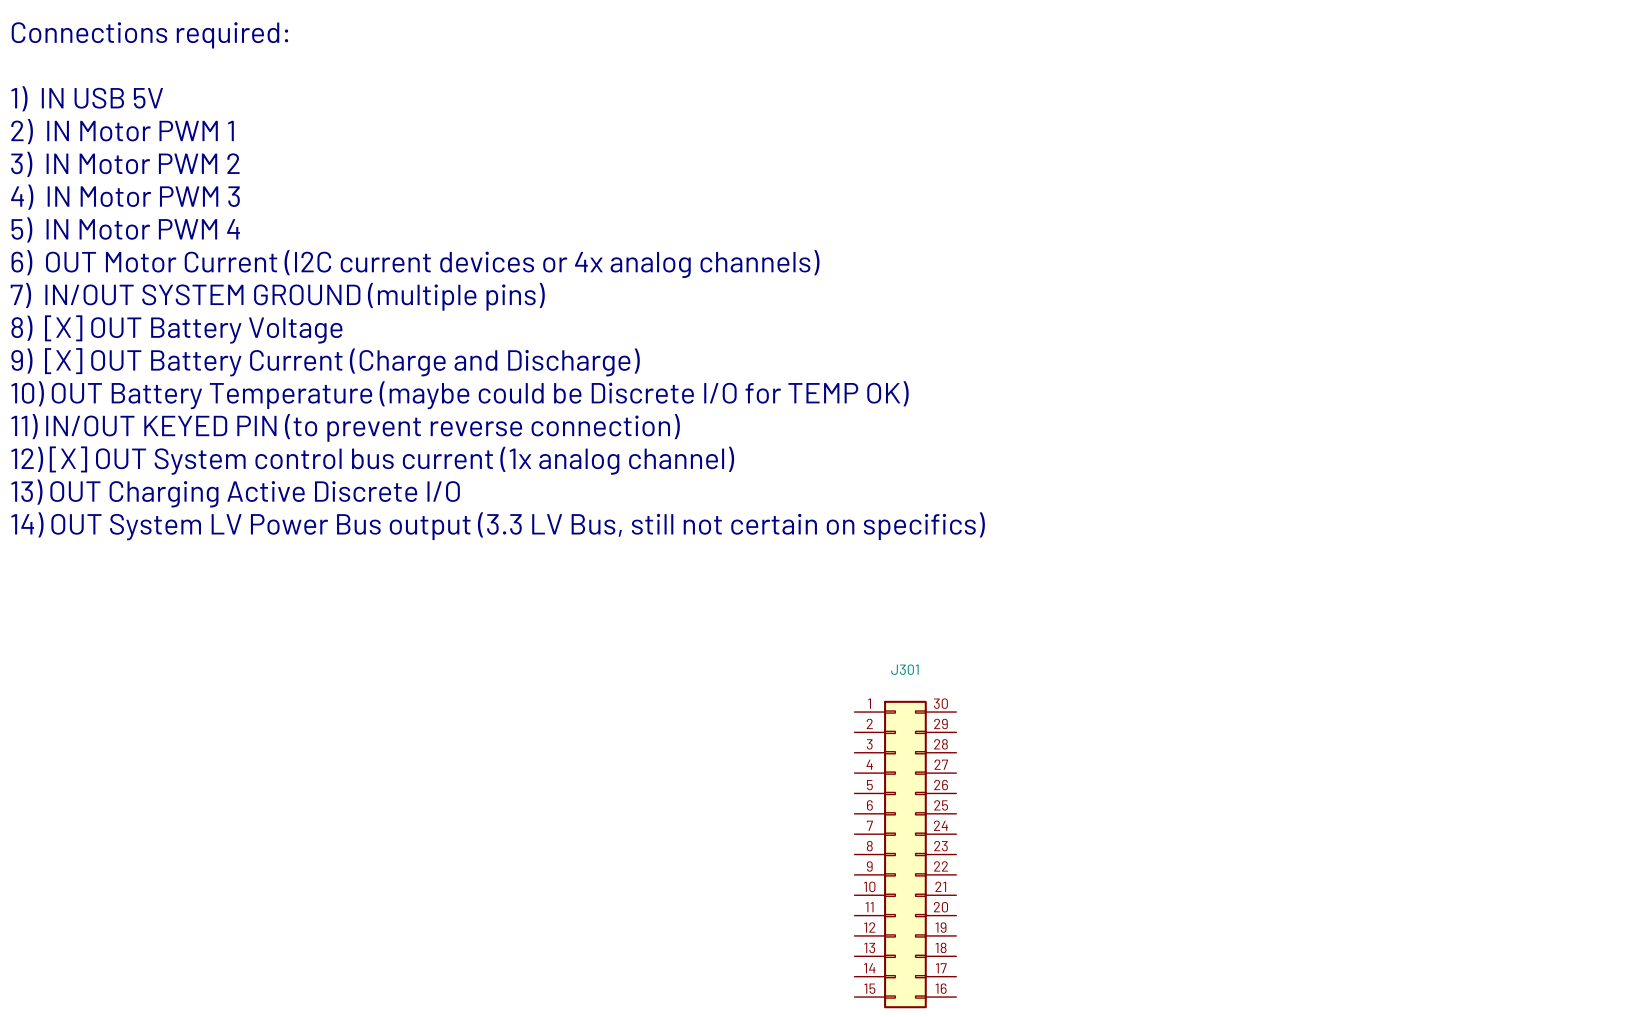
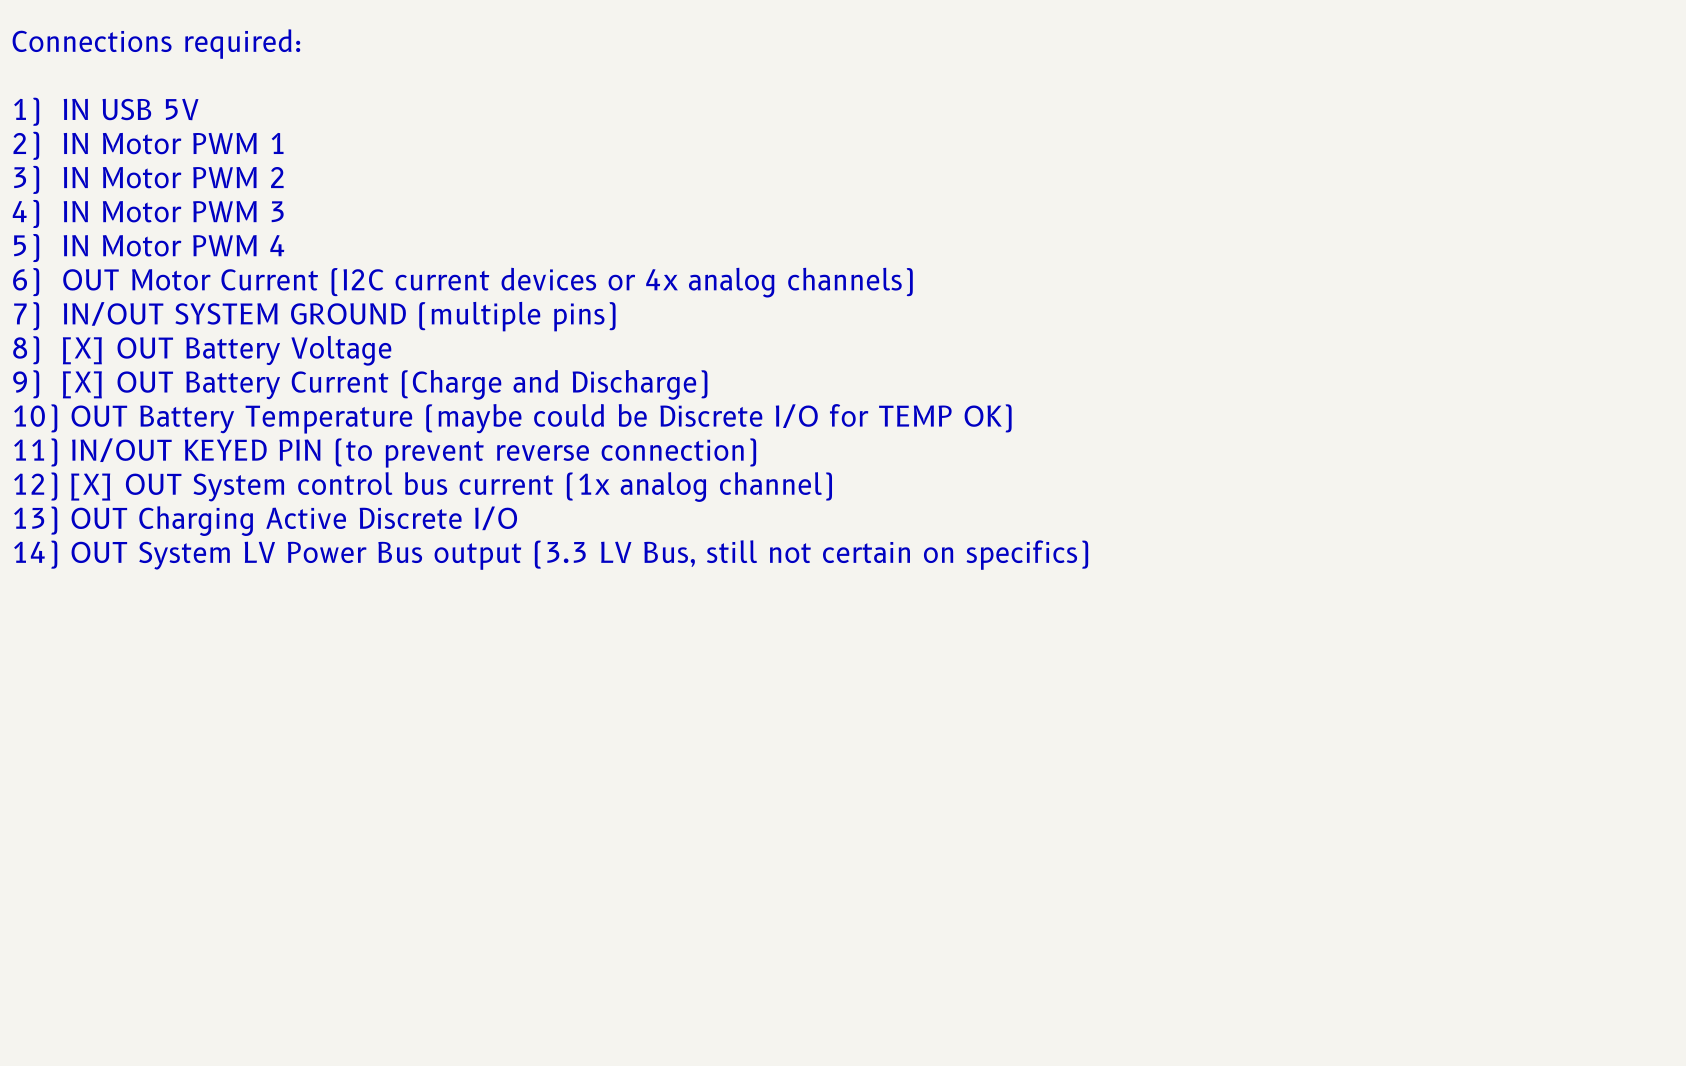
J301: (905, 854) -> none

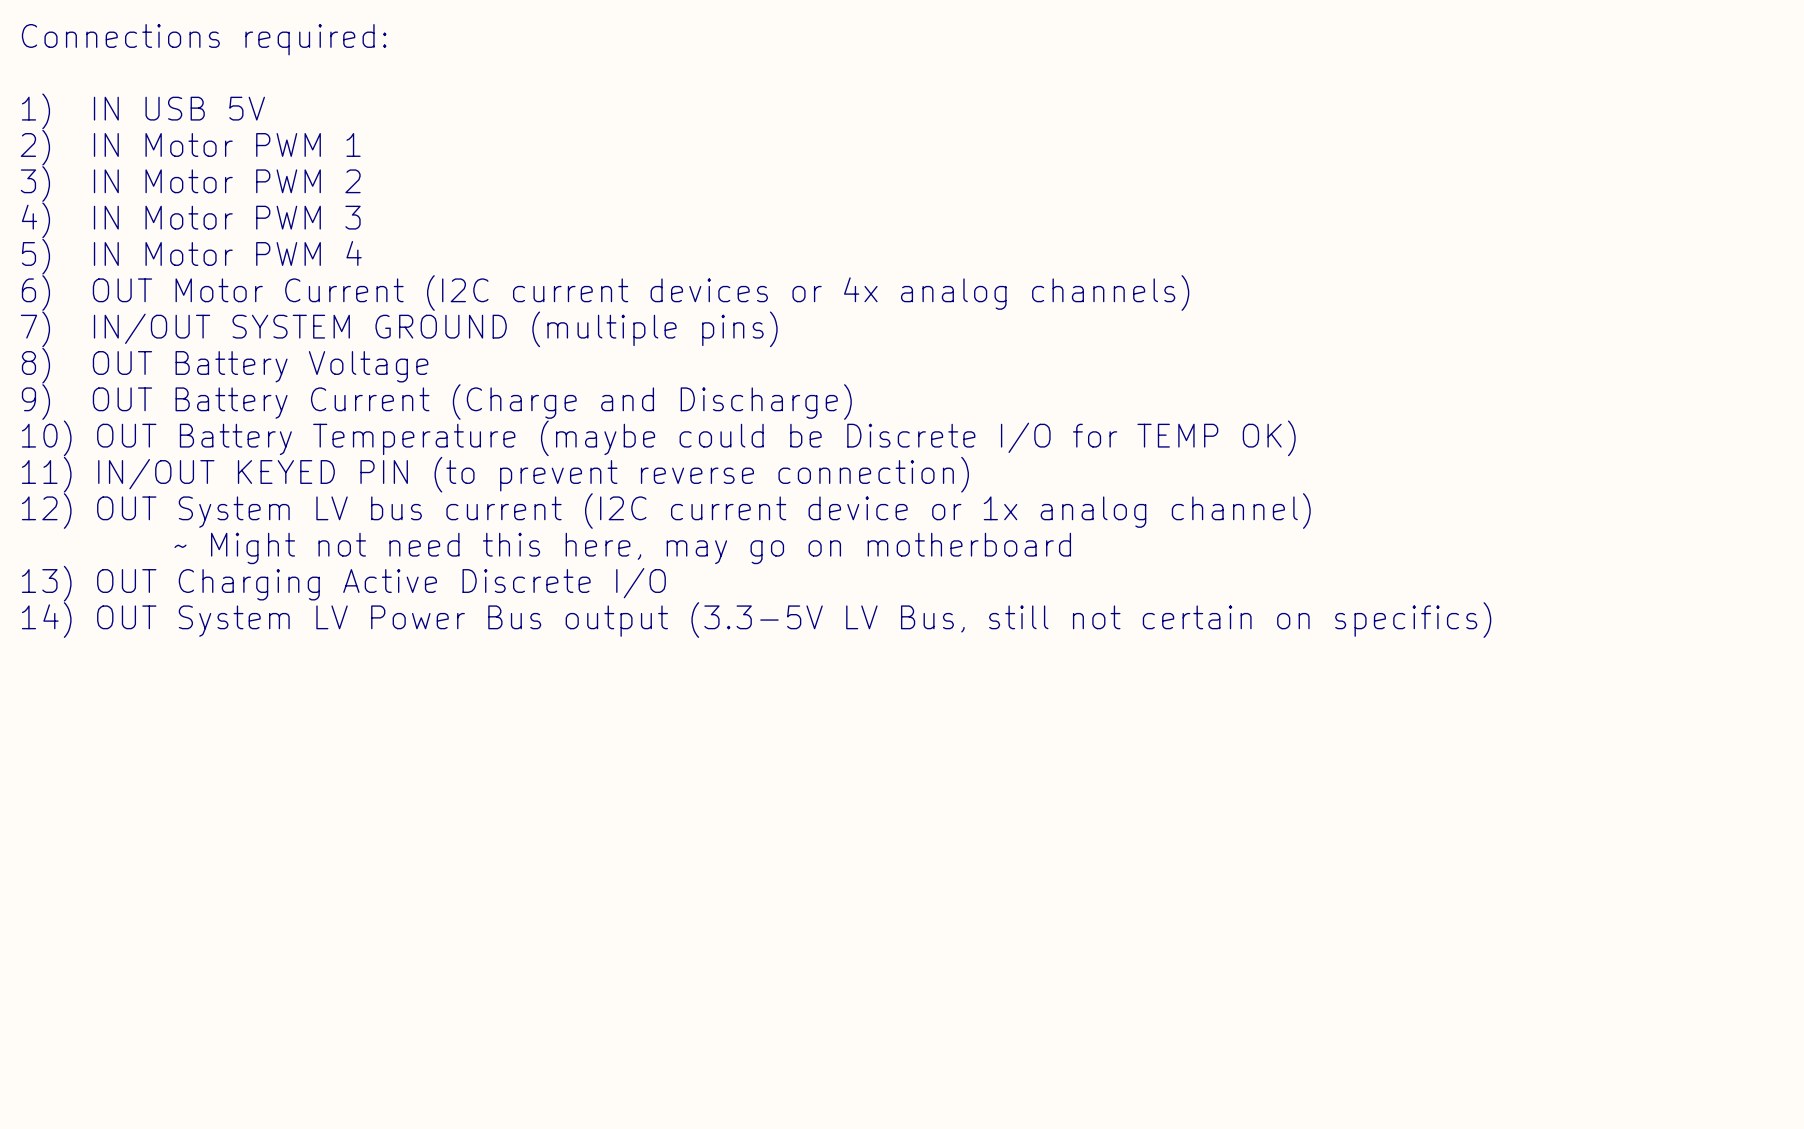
text: 8) [X] OUT Battery Voltage (202, 350) -> 8) OUT Battery Voltage (225, 365)
text: 9) [X] OUT Battery Current (Charge and Discharge) (360, 384) -> 9) OUT Battery Current (Charge and Discharge) (436, 402)
text: 12) [X] OUT System control bus current (1x analog channel) (423, 487) -> 12) OUT System LV bus current (I2C current device or 1x analog channel) (666, 511)
text: 13) OUT Charging Active Discrete I/O (265, 521) -> ~ Might not need this here, may go on motherboard (622, 548)
text: 14) OUT System LV Power Bus output (3.3 LV Bus, still not certain on specifics) (551, 555) -> 13) OUT Charging Active Discrete I/O (343, 583)
text: none -> 14) OUT System LV Power Bus output (3.3-5V LV Bus, still not certain on specifics) (756, 620)

